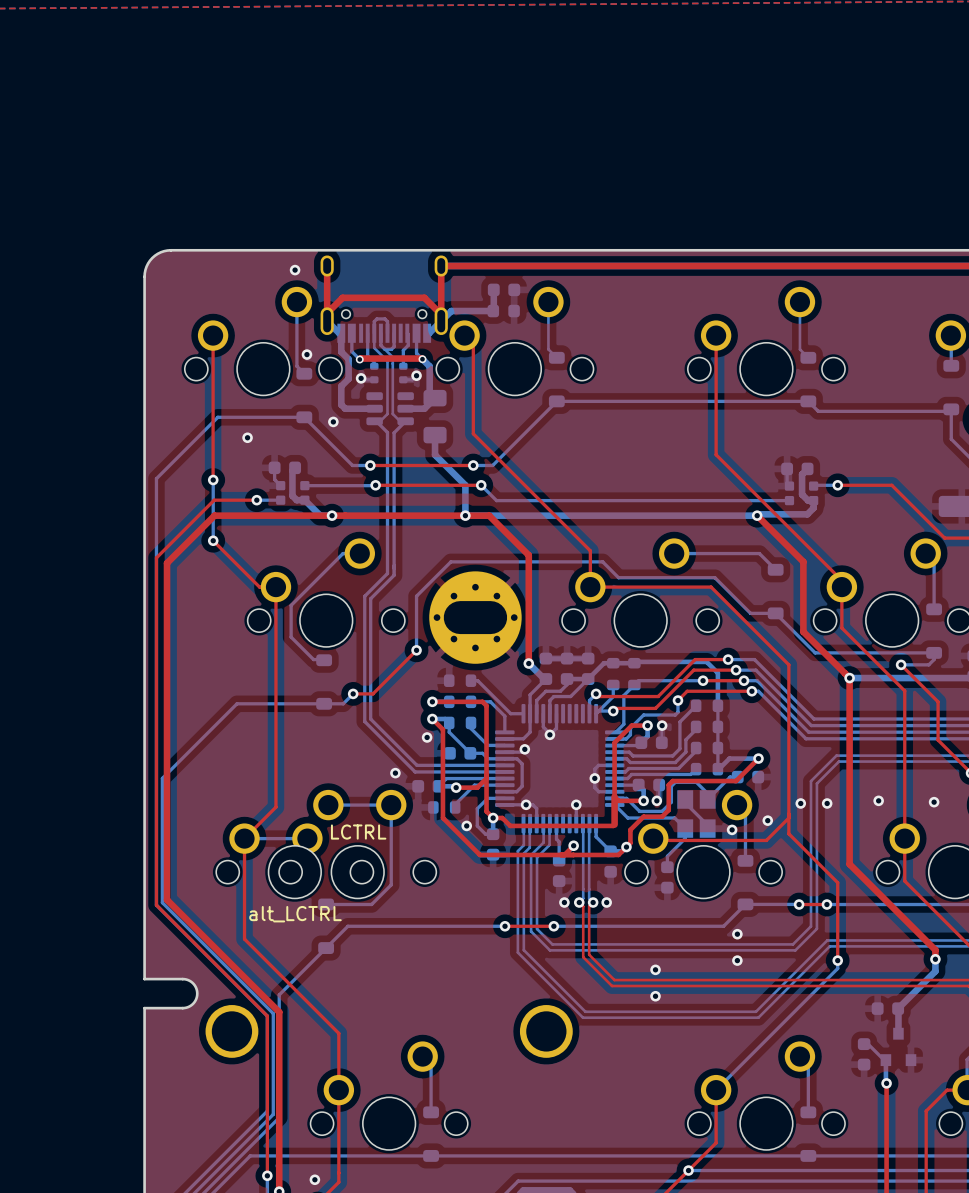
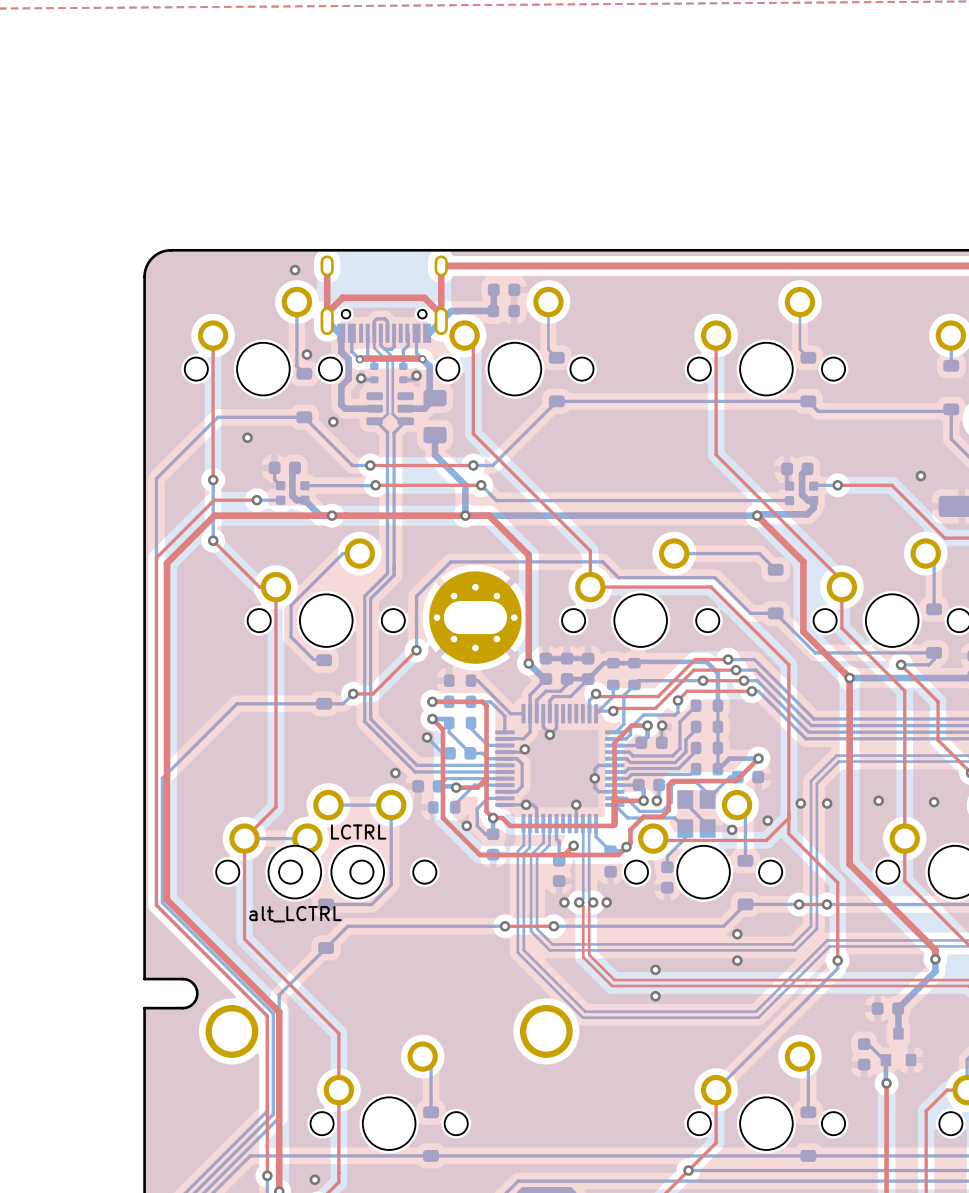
via: none -> (920, 476)
bottom track: none -> (427, 737) (442, 753) (449, 753)

